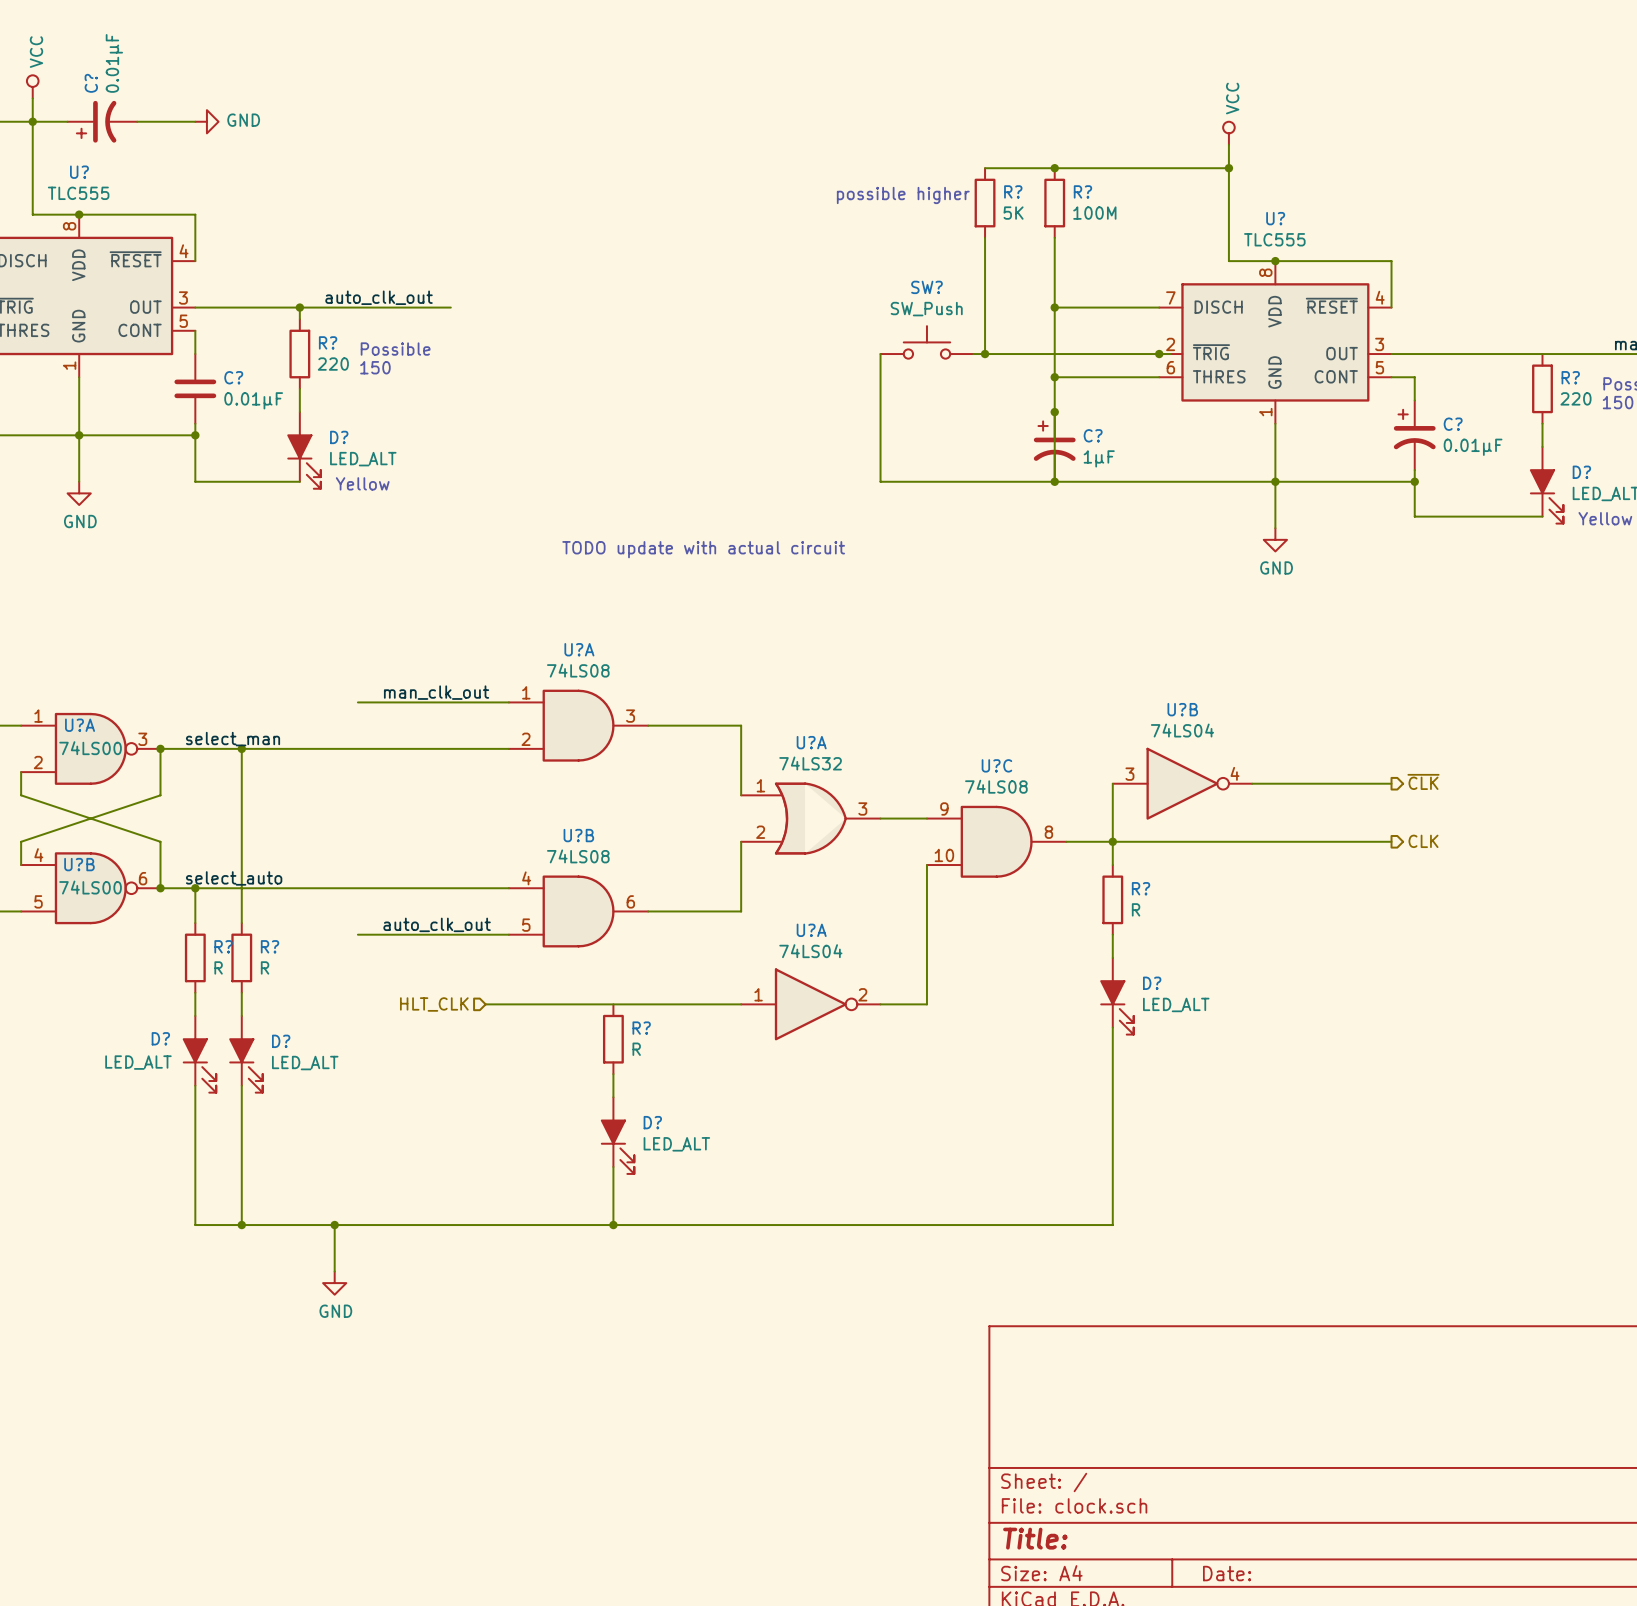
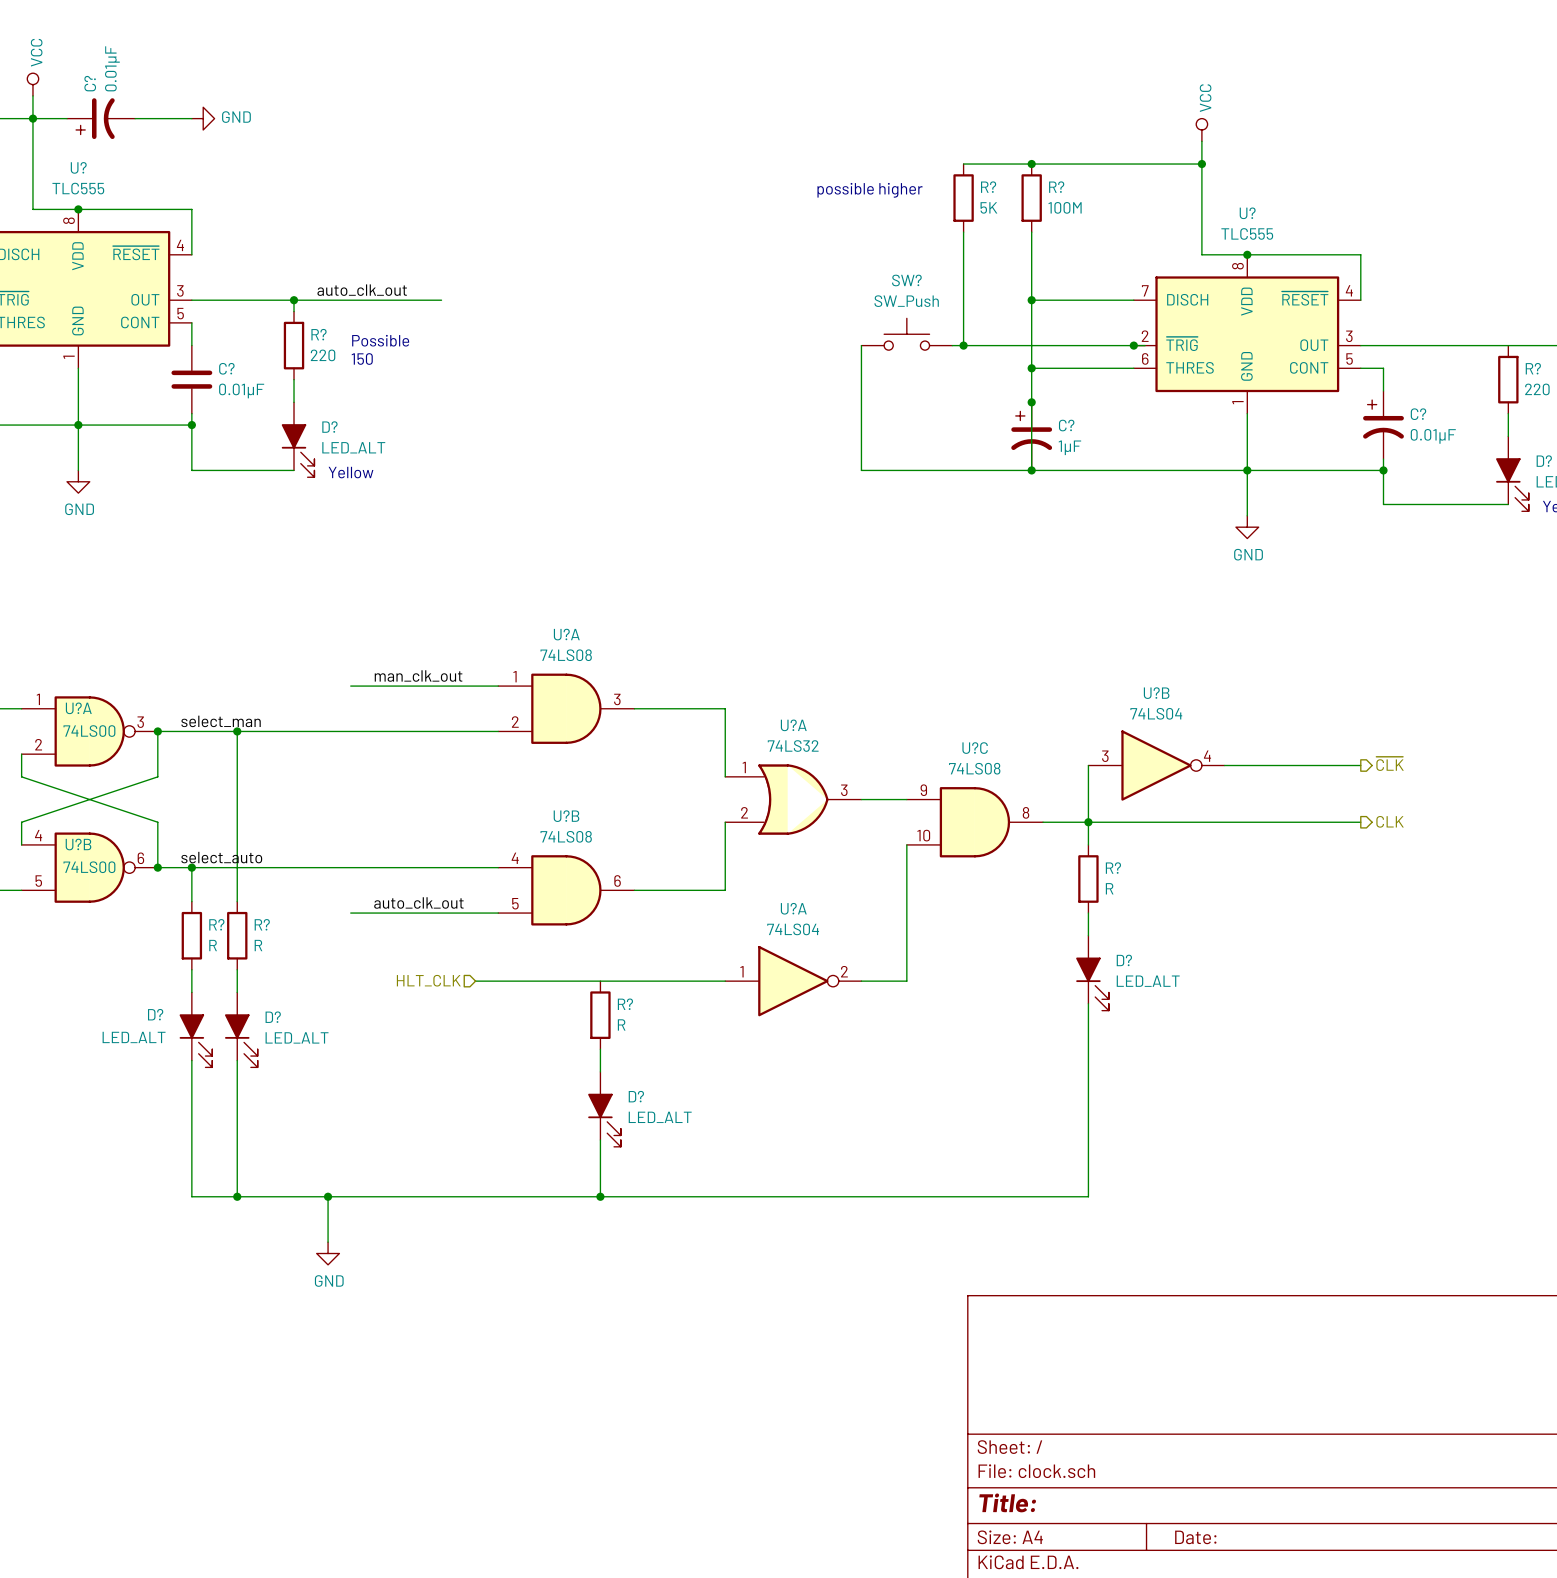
text: TODO update with actual circuit (703, 549) -> none

